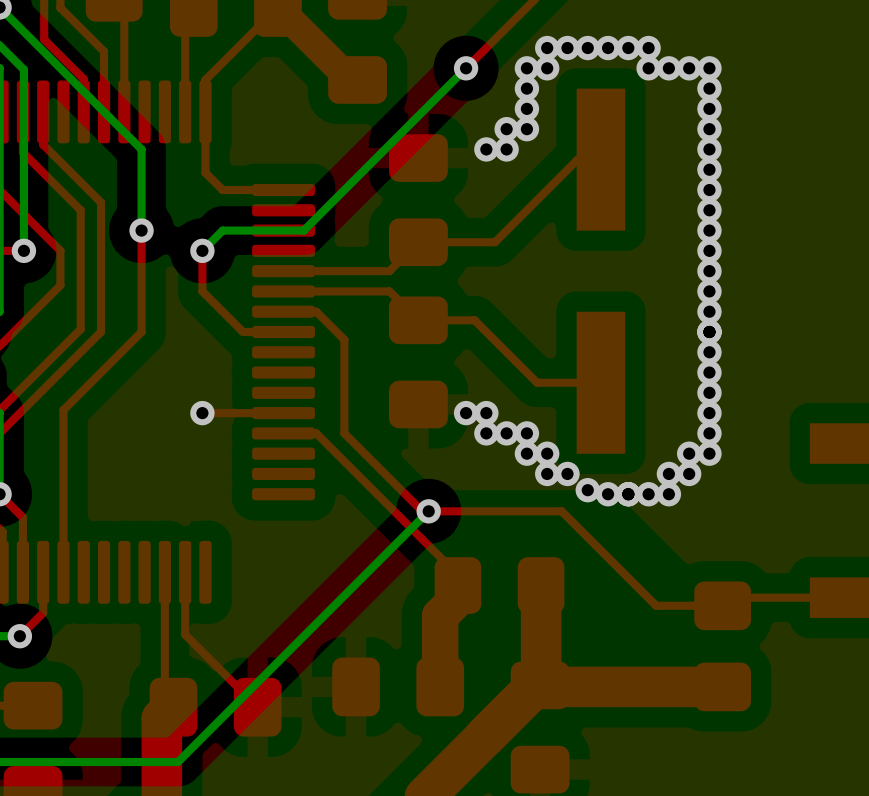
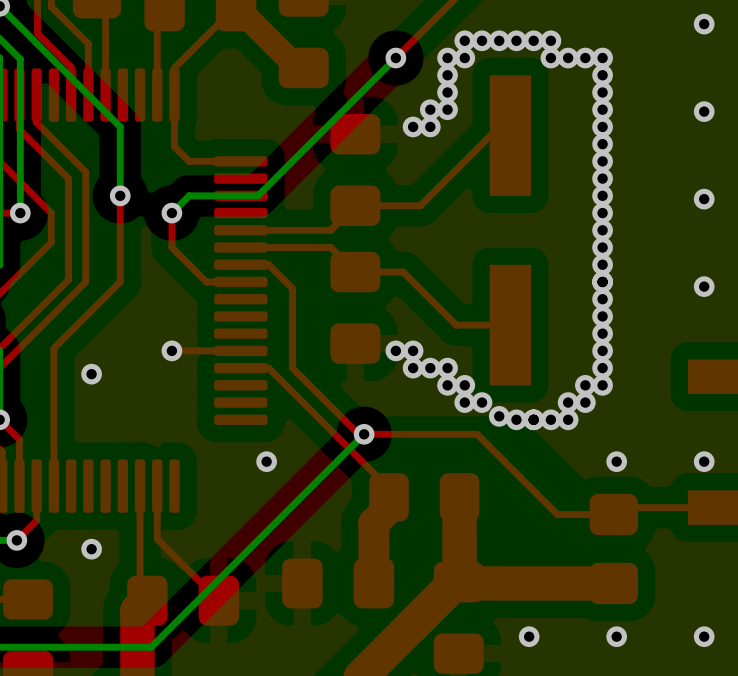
via: none -> (704, 24)
via: none -> (704, 111)
via: none -> (704, 199)
via: none -> (704, 286)
via: none -> (91, 374)
via: none -> (266, 461)
via: none -> (616, 461)
via: none -> (704, 461)
via: none -> (91, 549)
via: none -> (529, 636)
via: none -> (616, 636)
via: none -> (704, 636)

